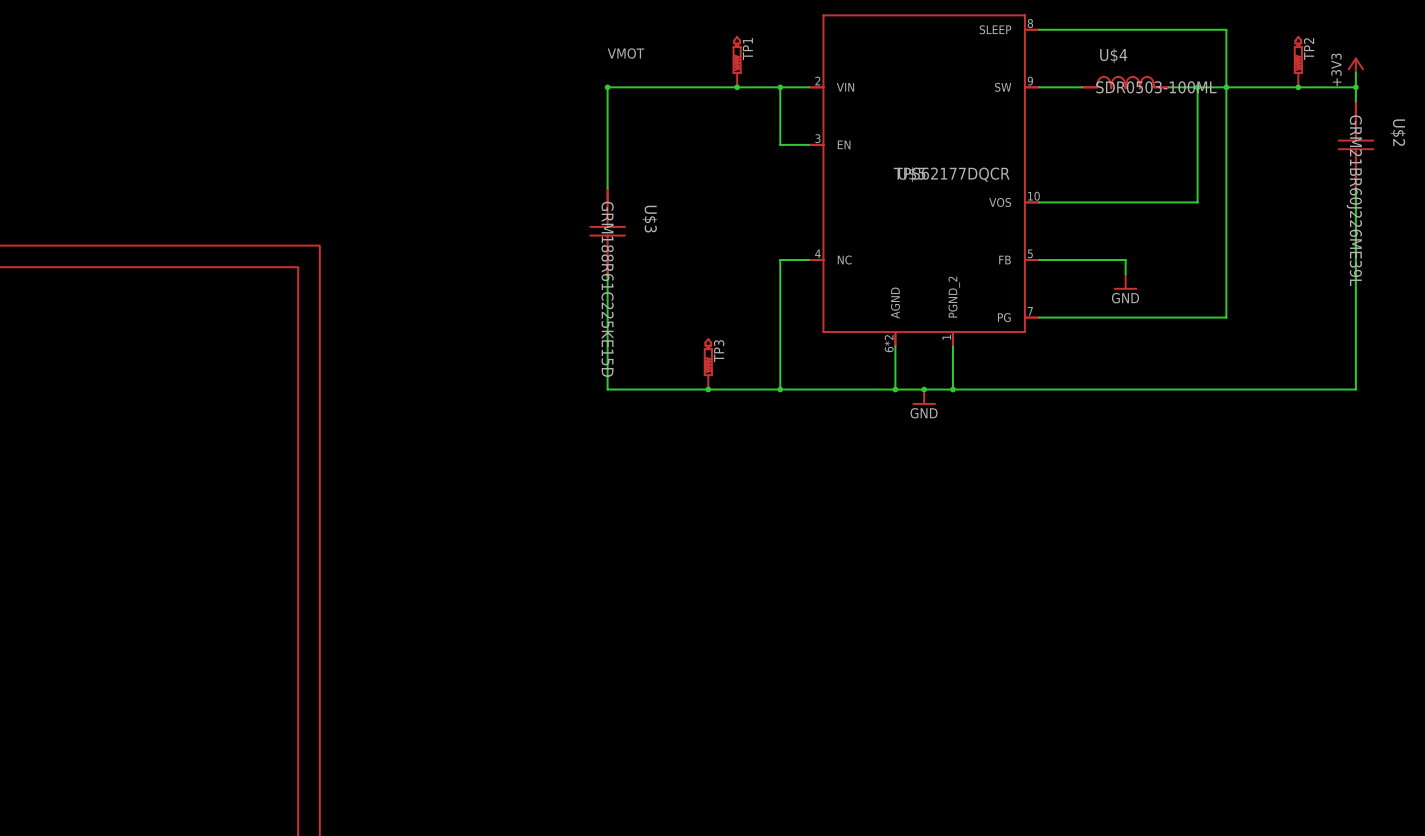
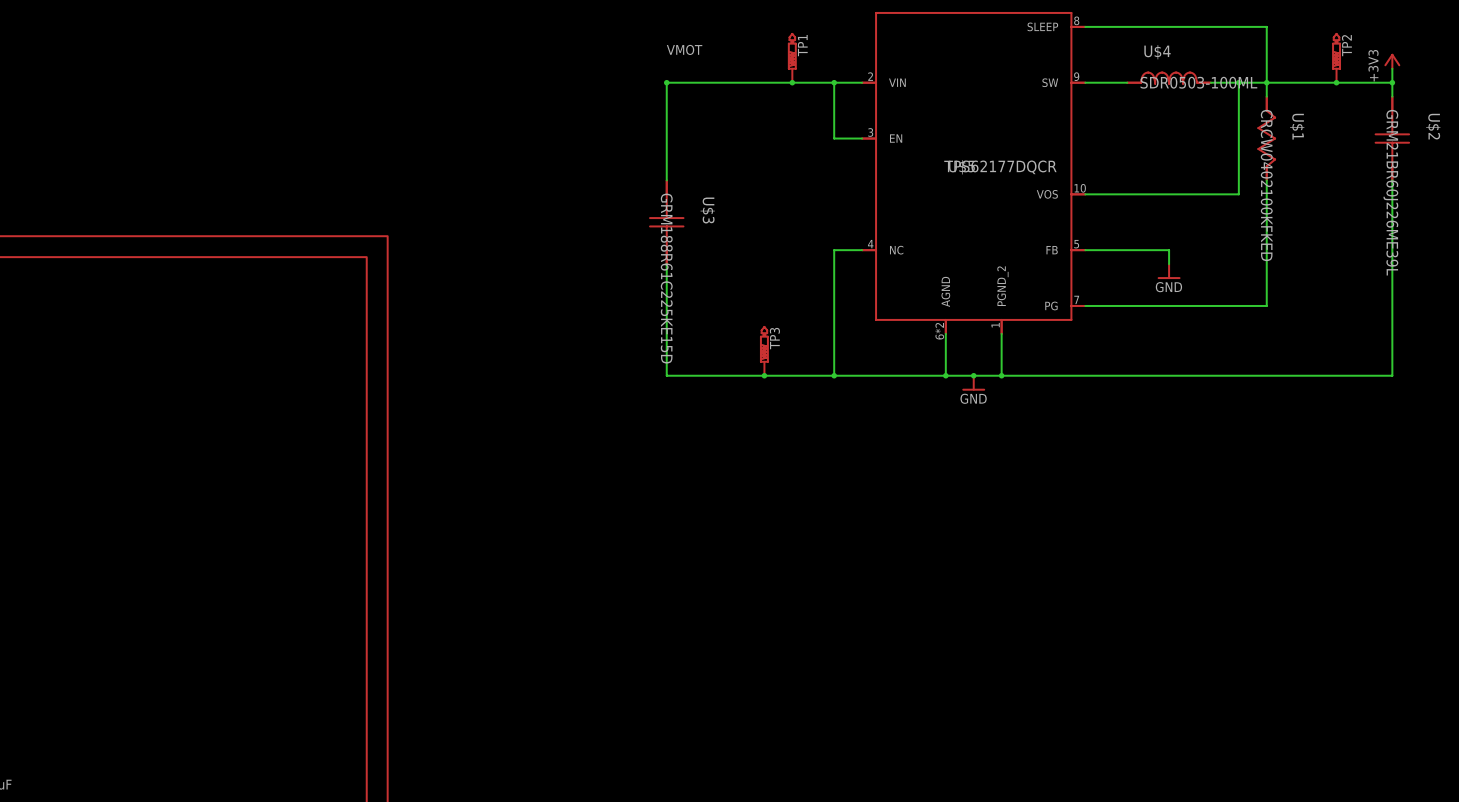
U$1: none -> CRCW0402100KFKED (1266, 138)

